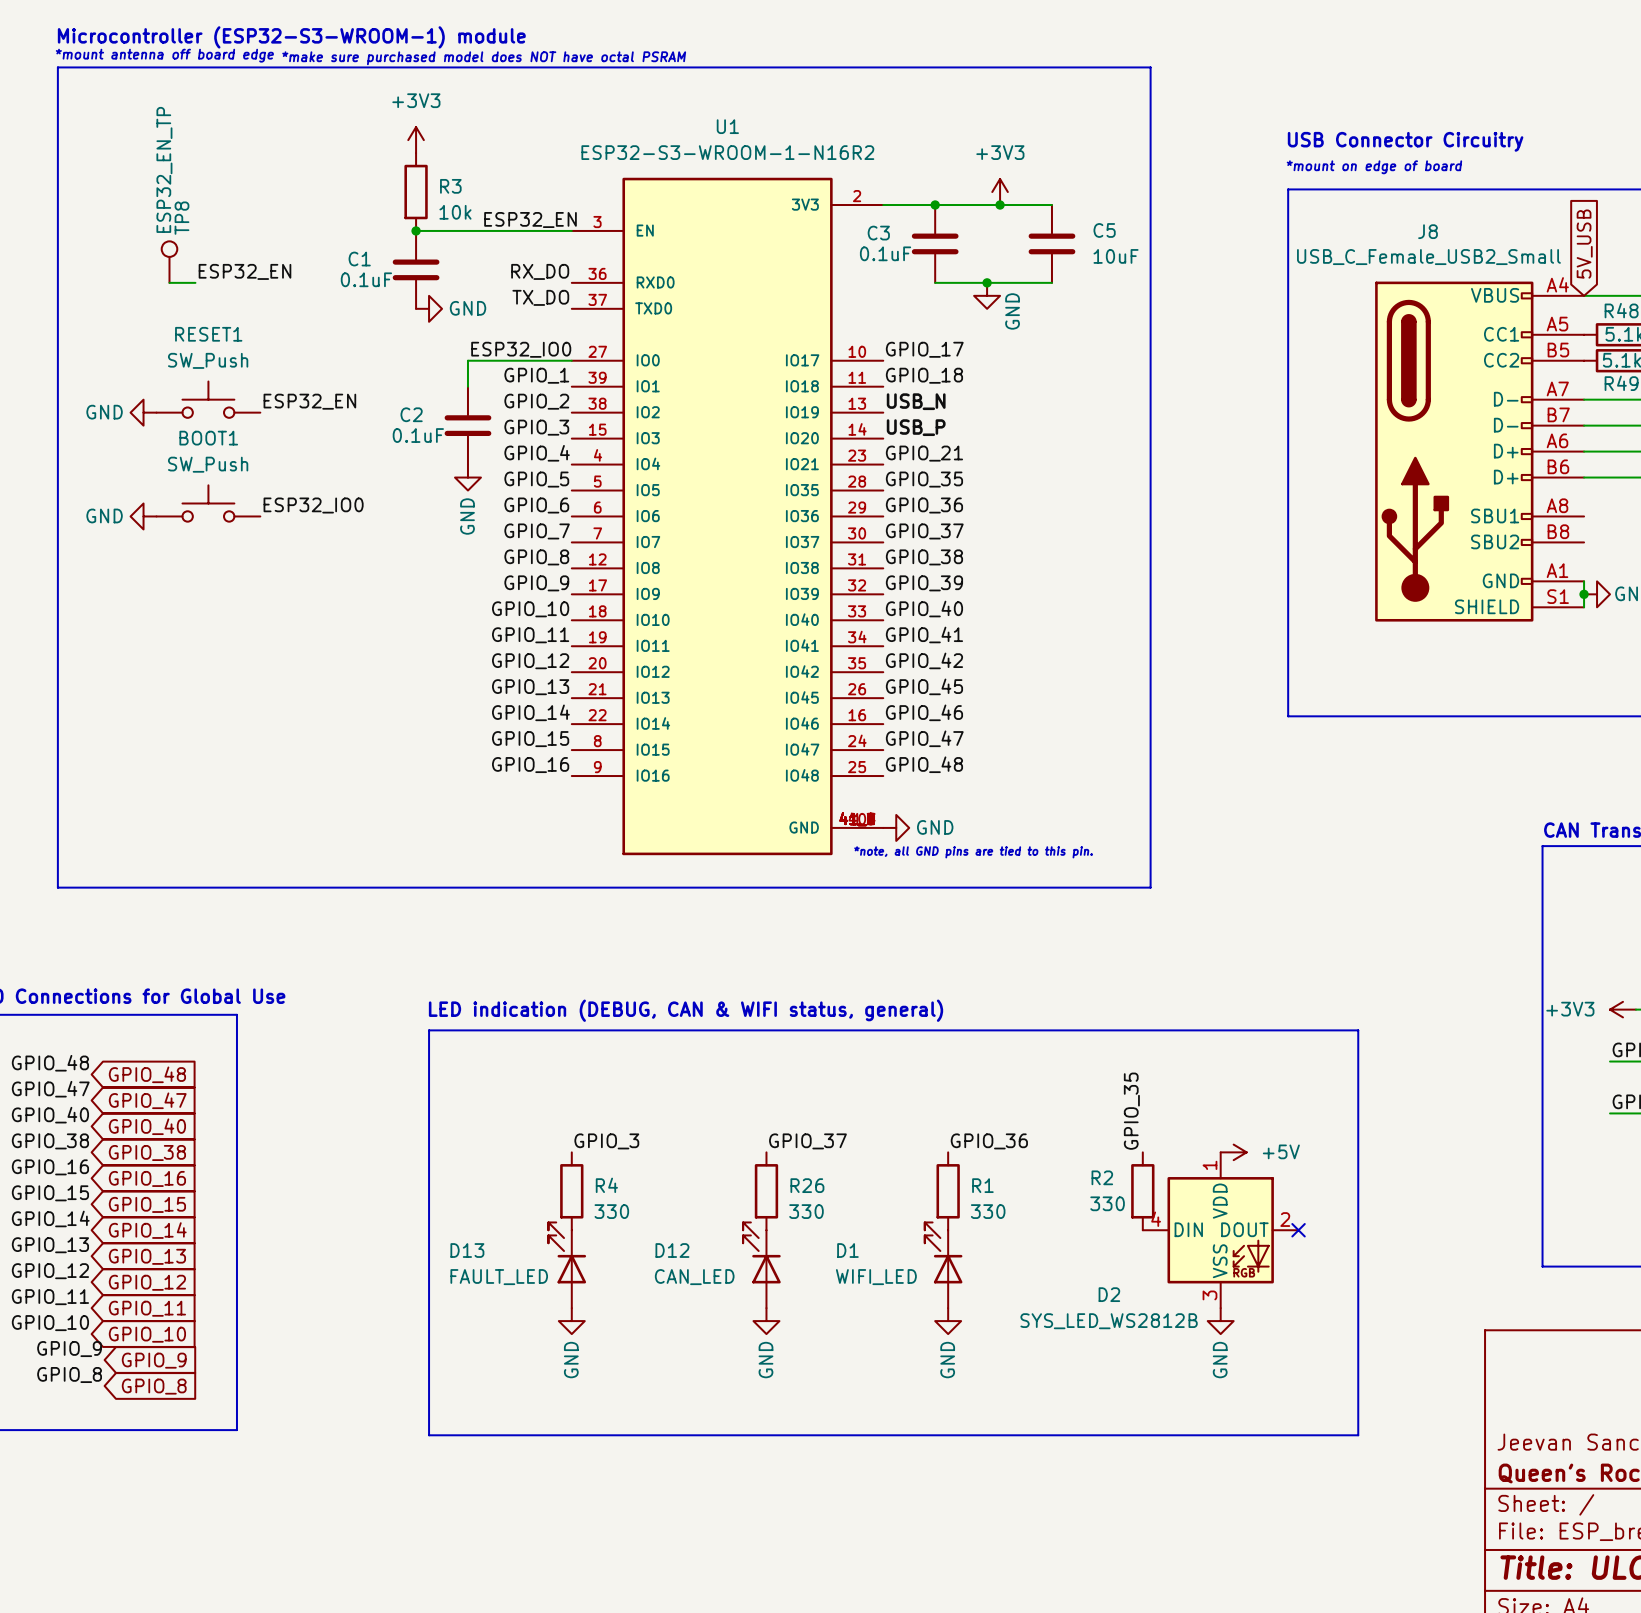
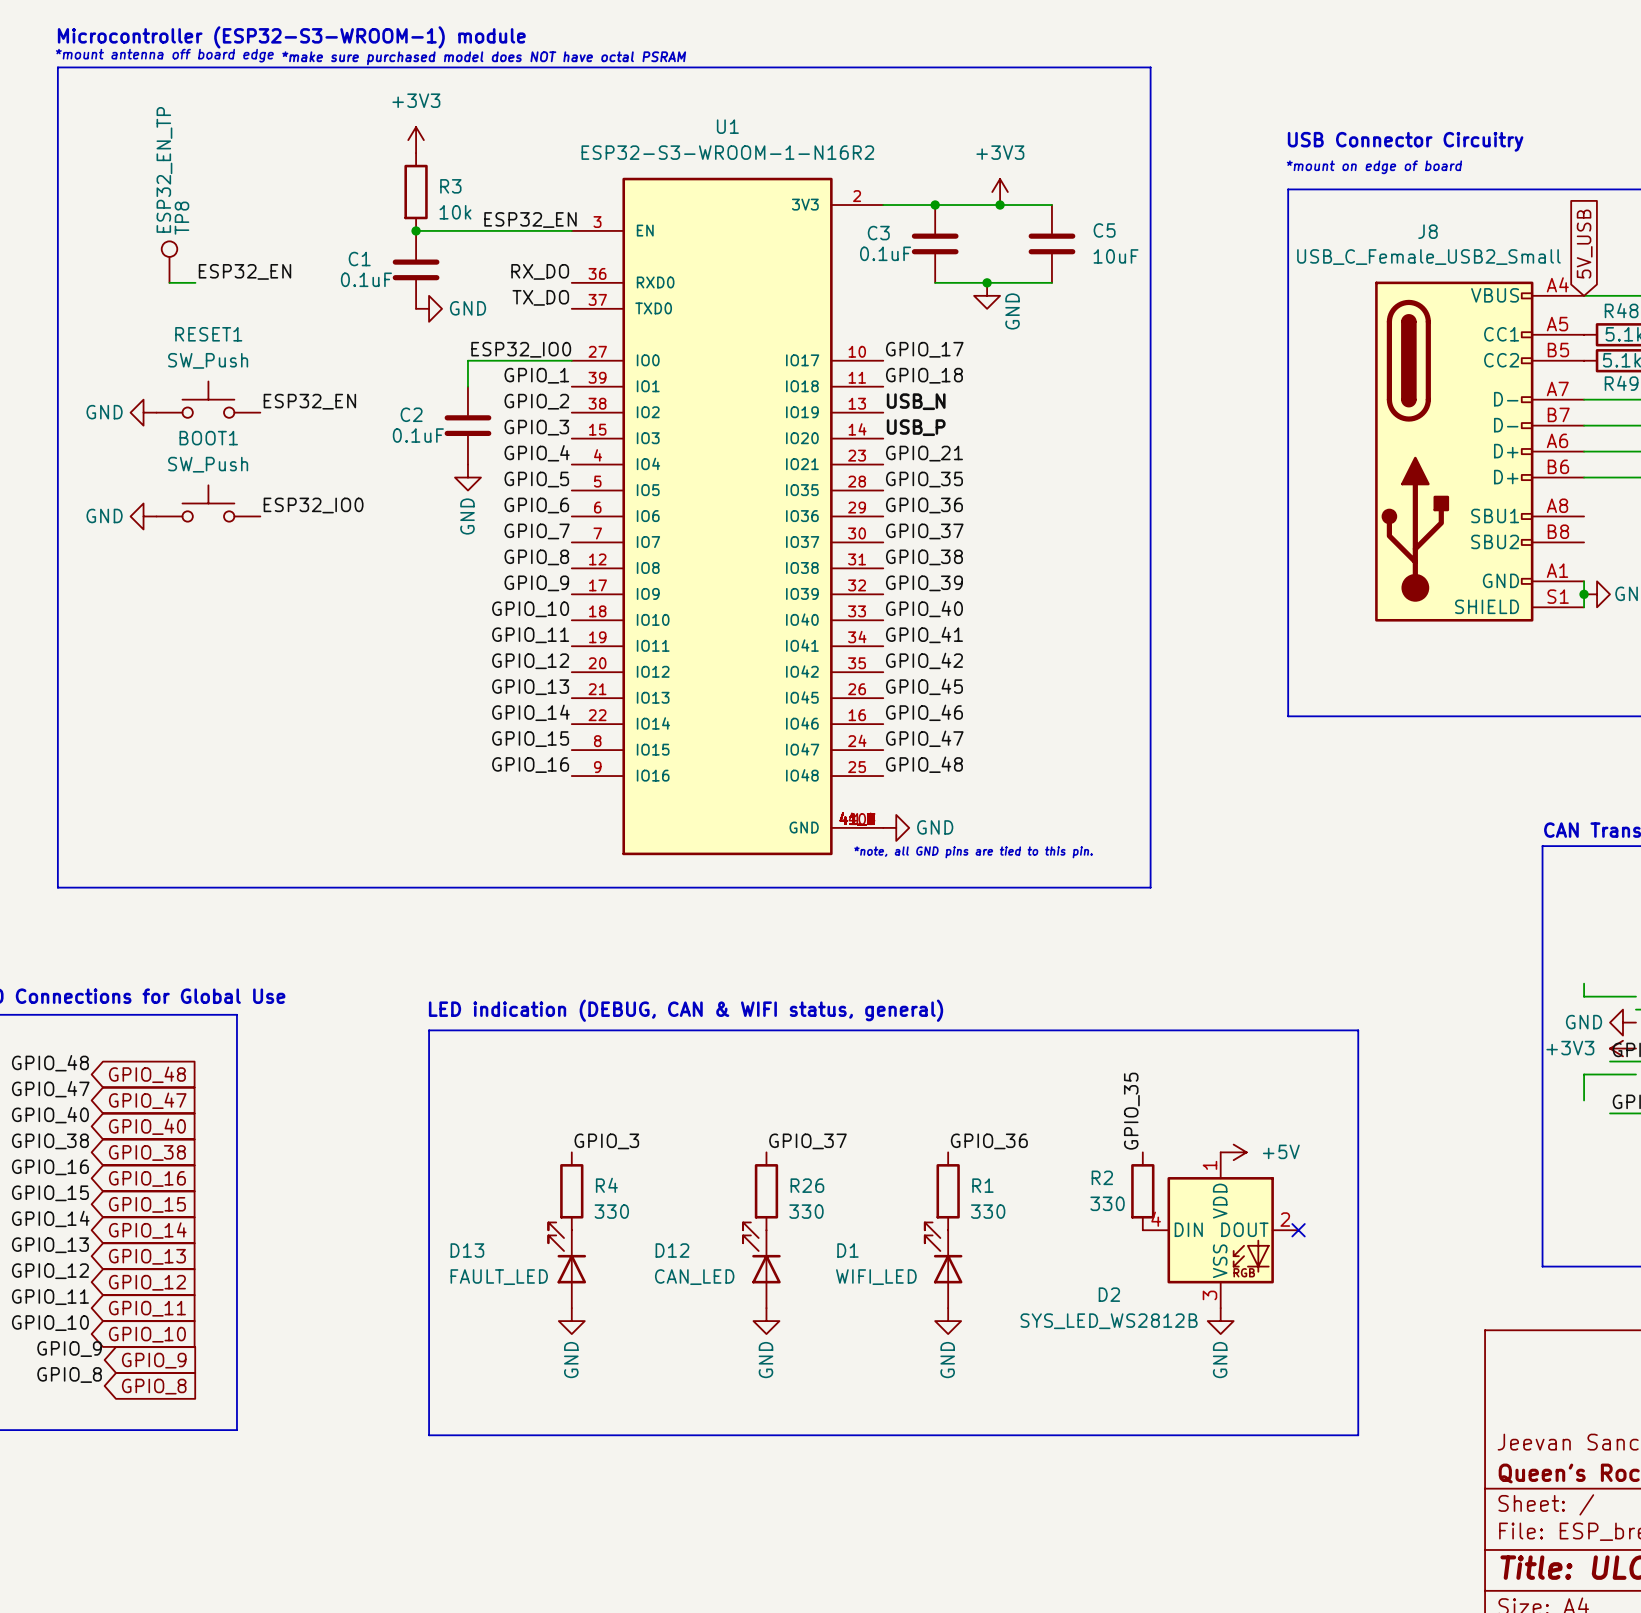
wire: none -> (1584, 983) (1584, 996) (1635, 996)
power symbol position: +3V3 (1622, 1009) -> +3V3 (1622, 1048)
power symbol: none -> GND (1622, 1022)
wire: none -> (1635, 1074) (1584, 1074) (1584, 1100)

